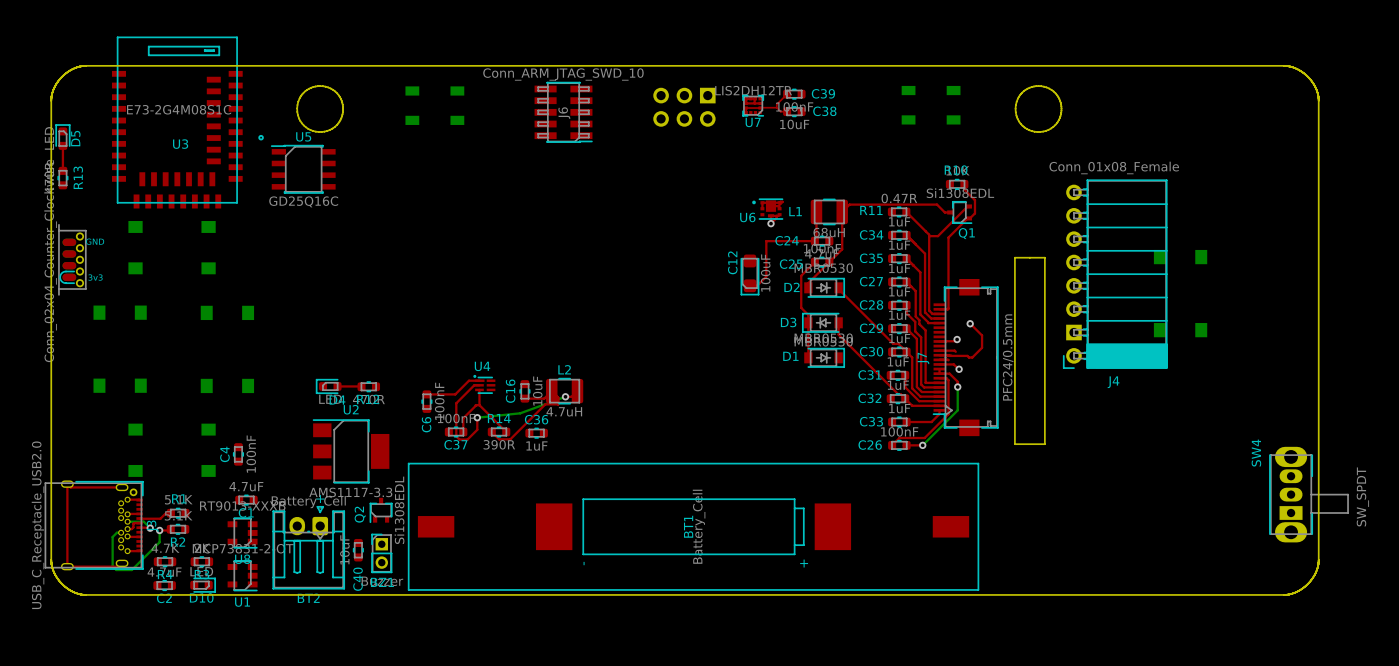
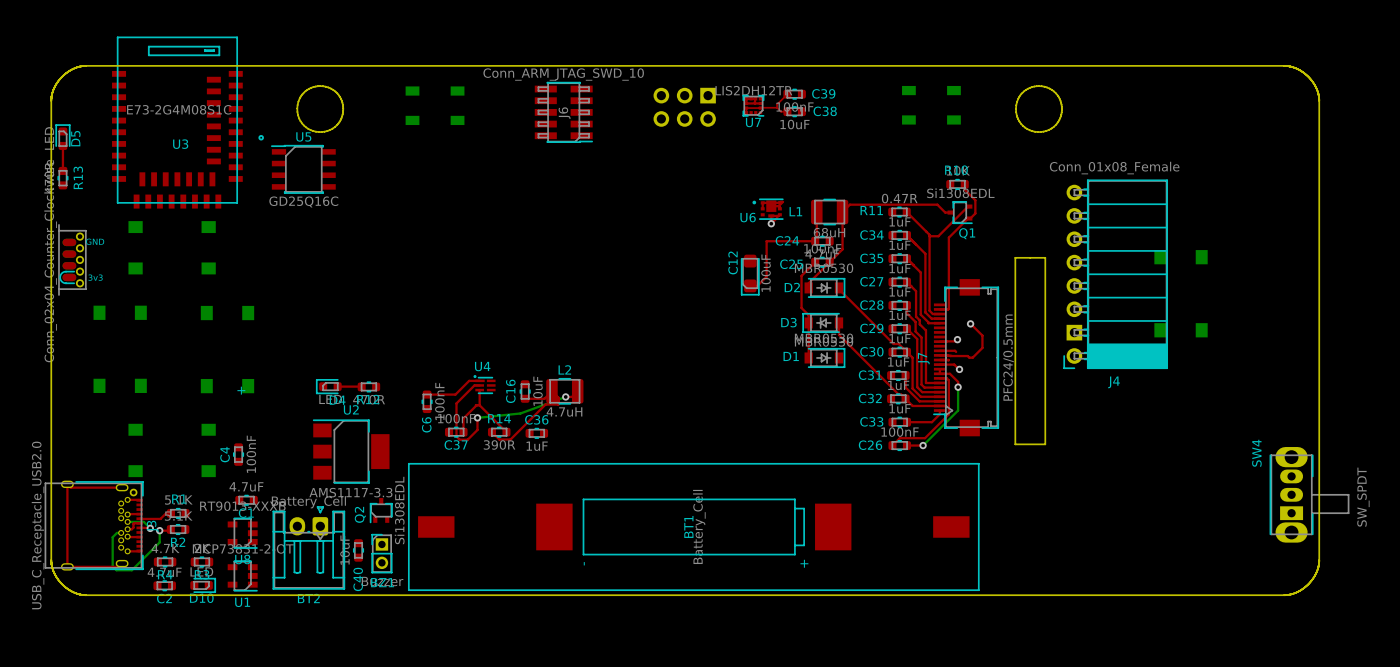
text position: + (320, 499) -> + (241, 390)

